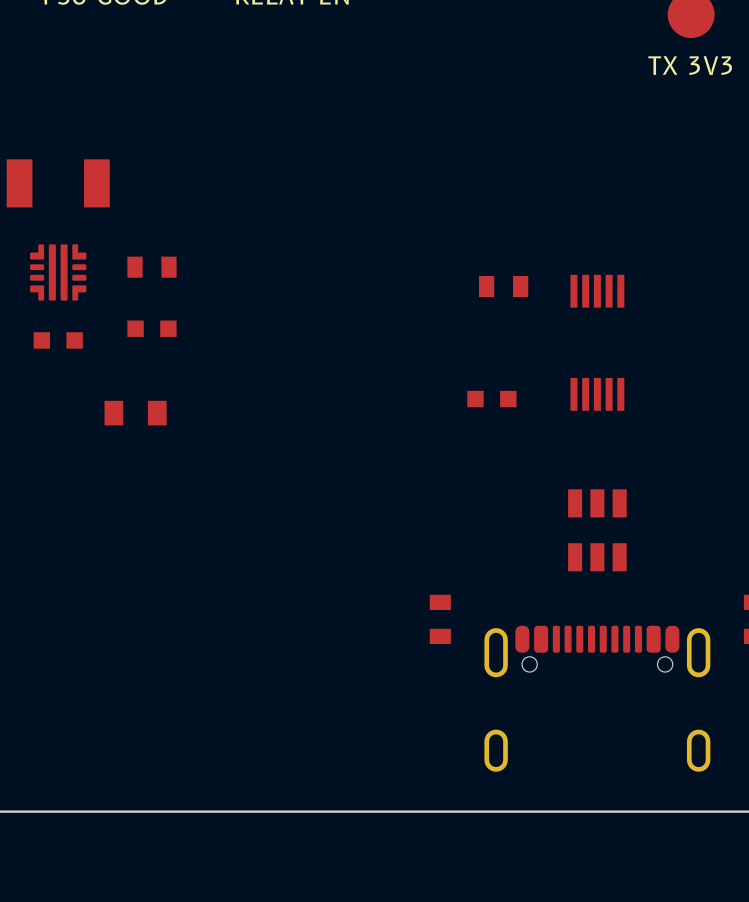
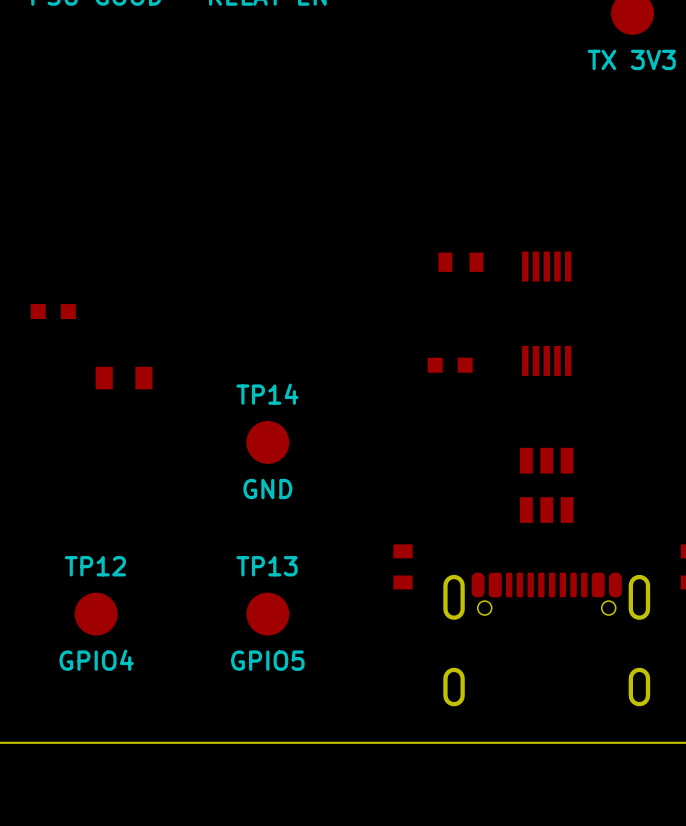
part: (58, 183) -> none
part: (151, 267) -> none
part: (58, 272) -> none
part: (151, 328) -> none
TP14: none -> (267, 442)
TP12: none -> (96, 614)
TP13: none -> (267, 614)

